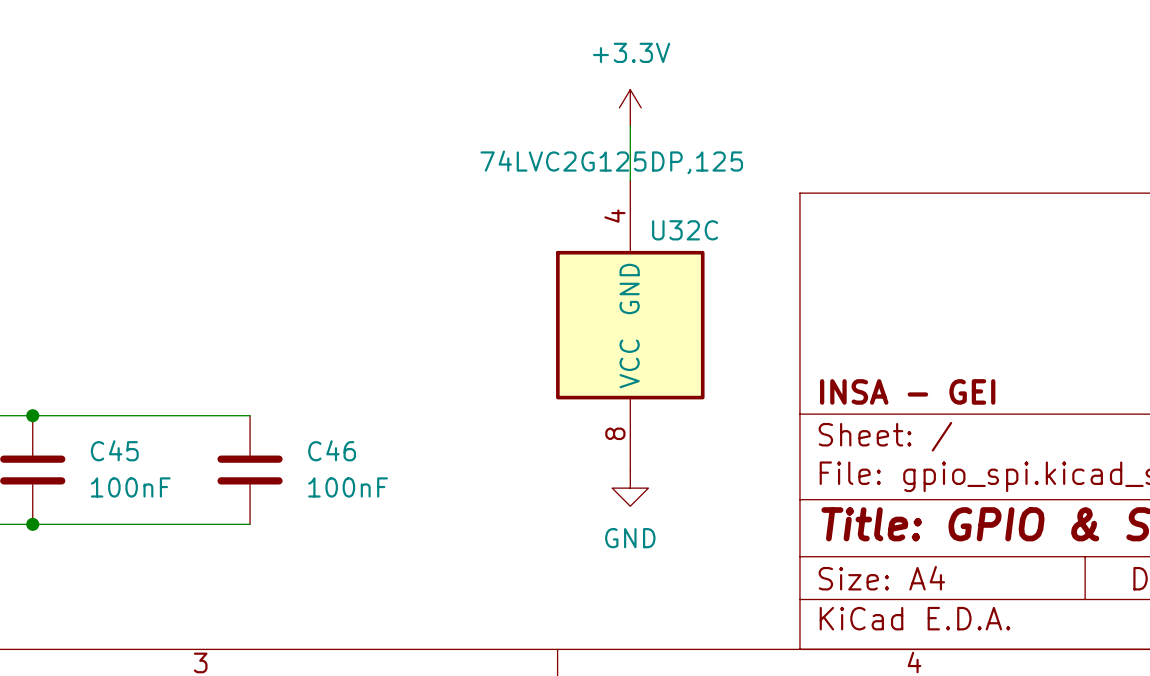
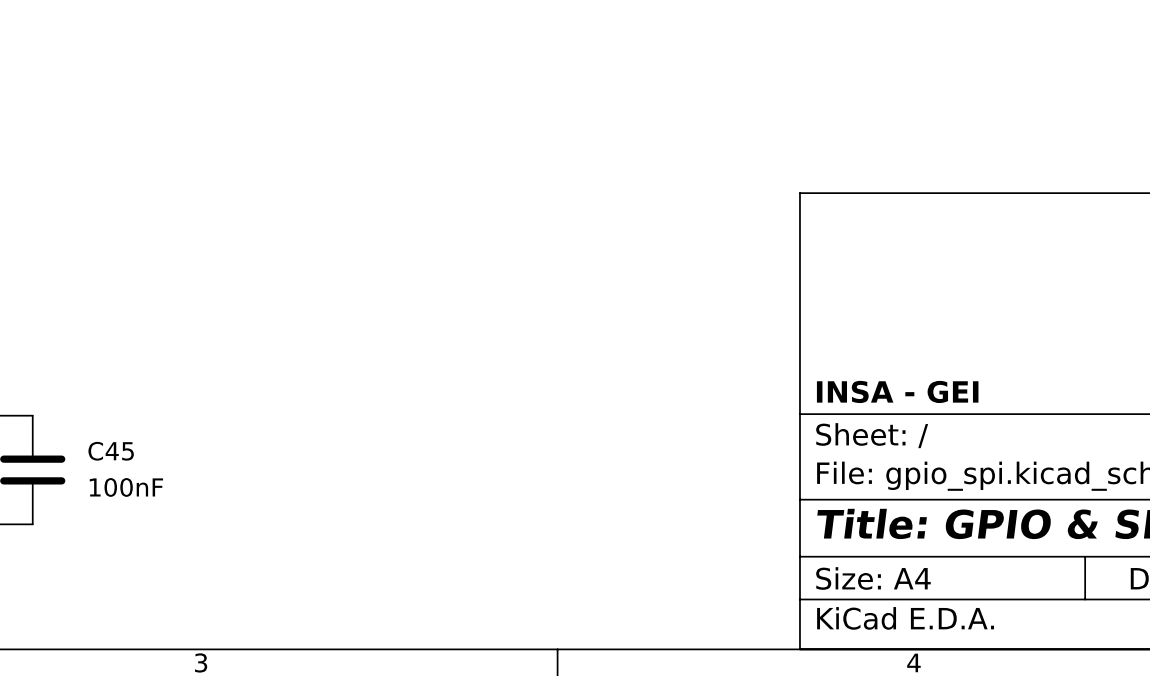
power symbol: +3.3V (630, 107) -> none
wire: (630, 125) (630, 180) -> none
U32C: 74LVC2G125DP,125 (630, 325) -> none
wire: (32, 415) (250, 415) -> none
junction: (32, 415) -> none
C46: 100nF (250, 470) -> none
power symbol: GND (630, 488) -> none
wire: (32, 524) (250, 524) -> none
junction: (32, 524) -> none

